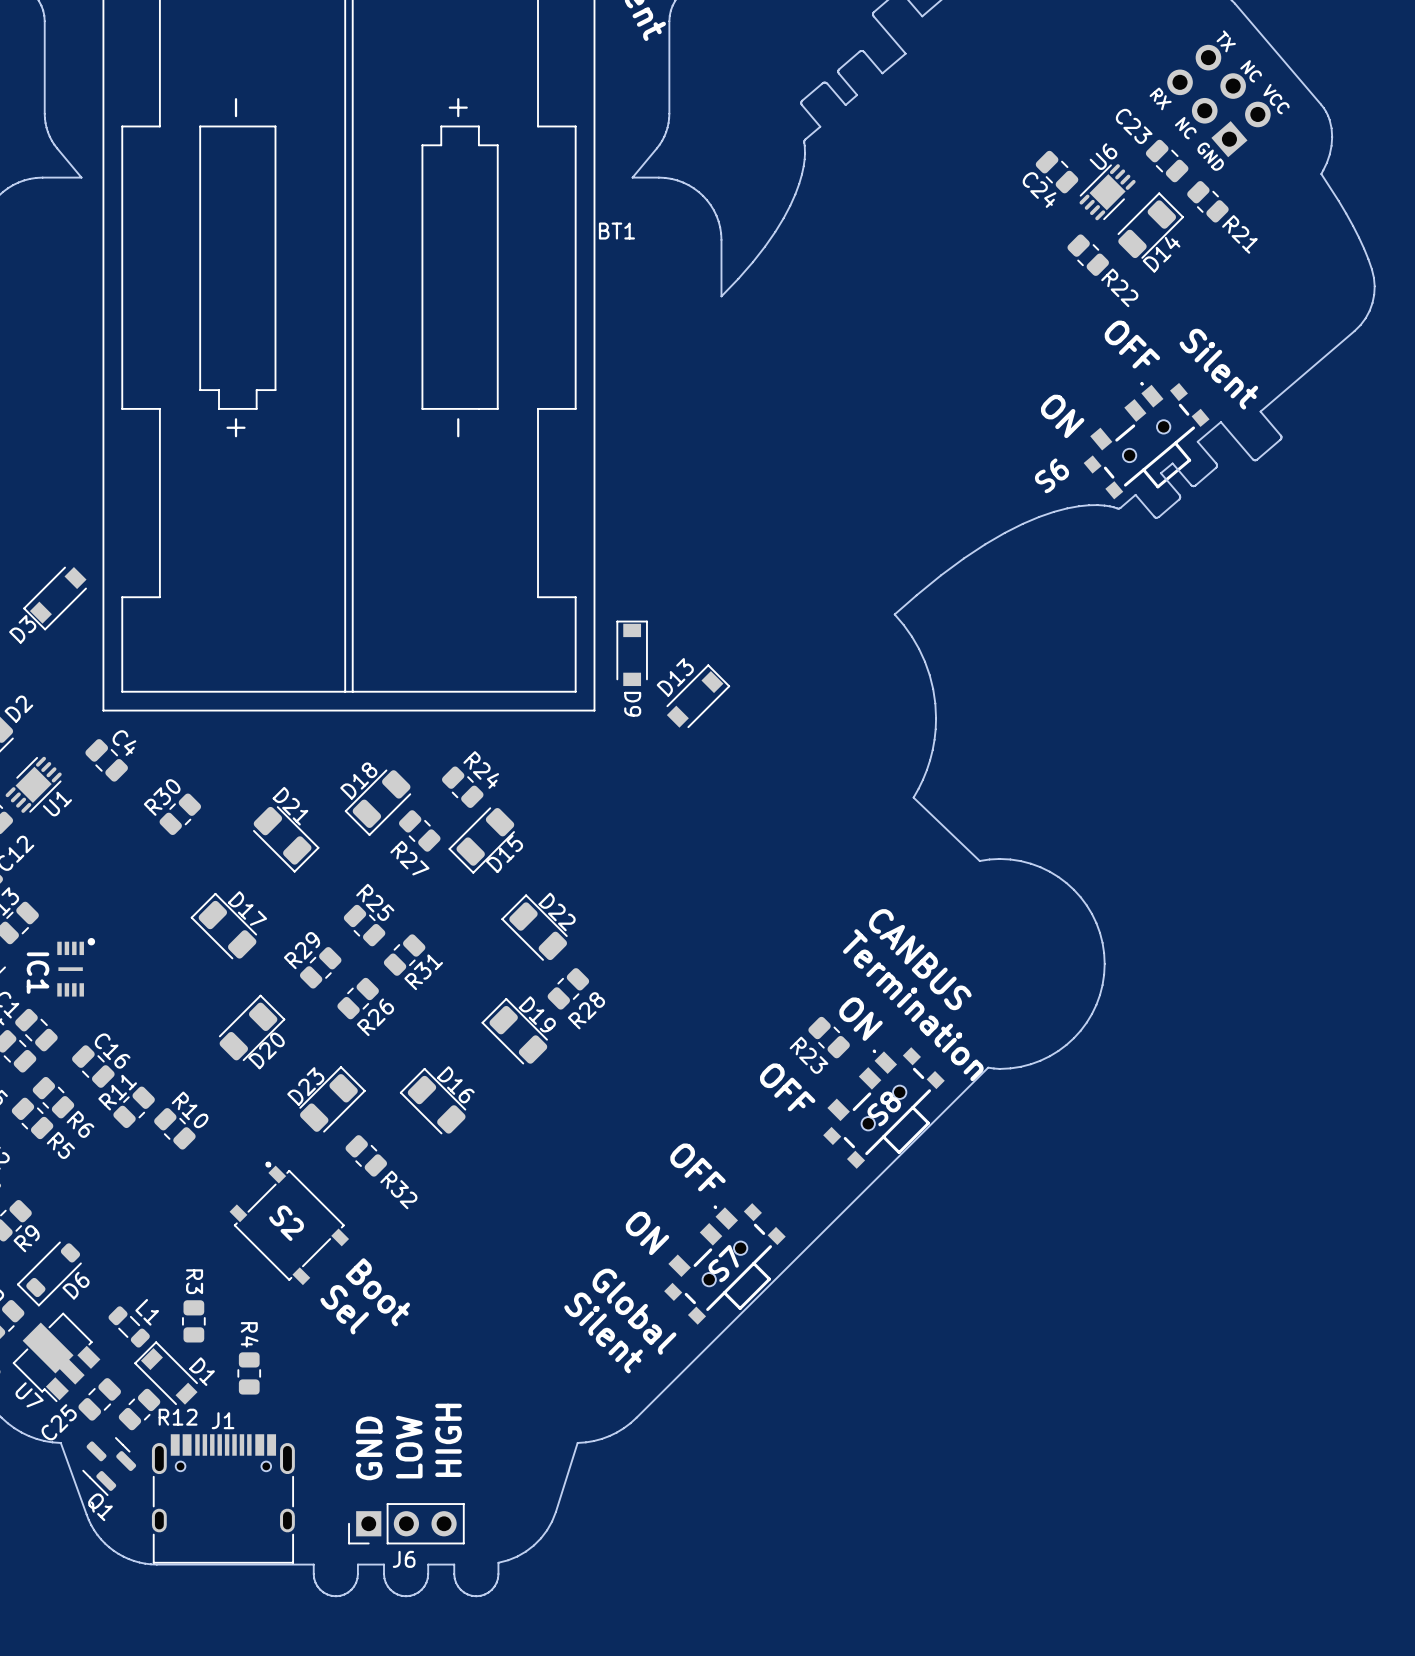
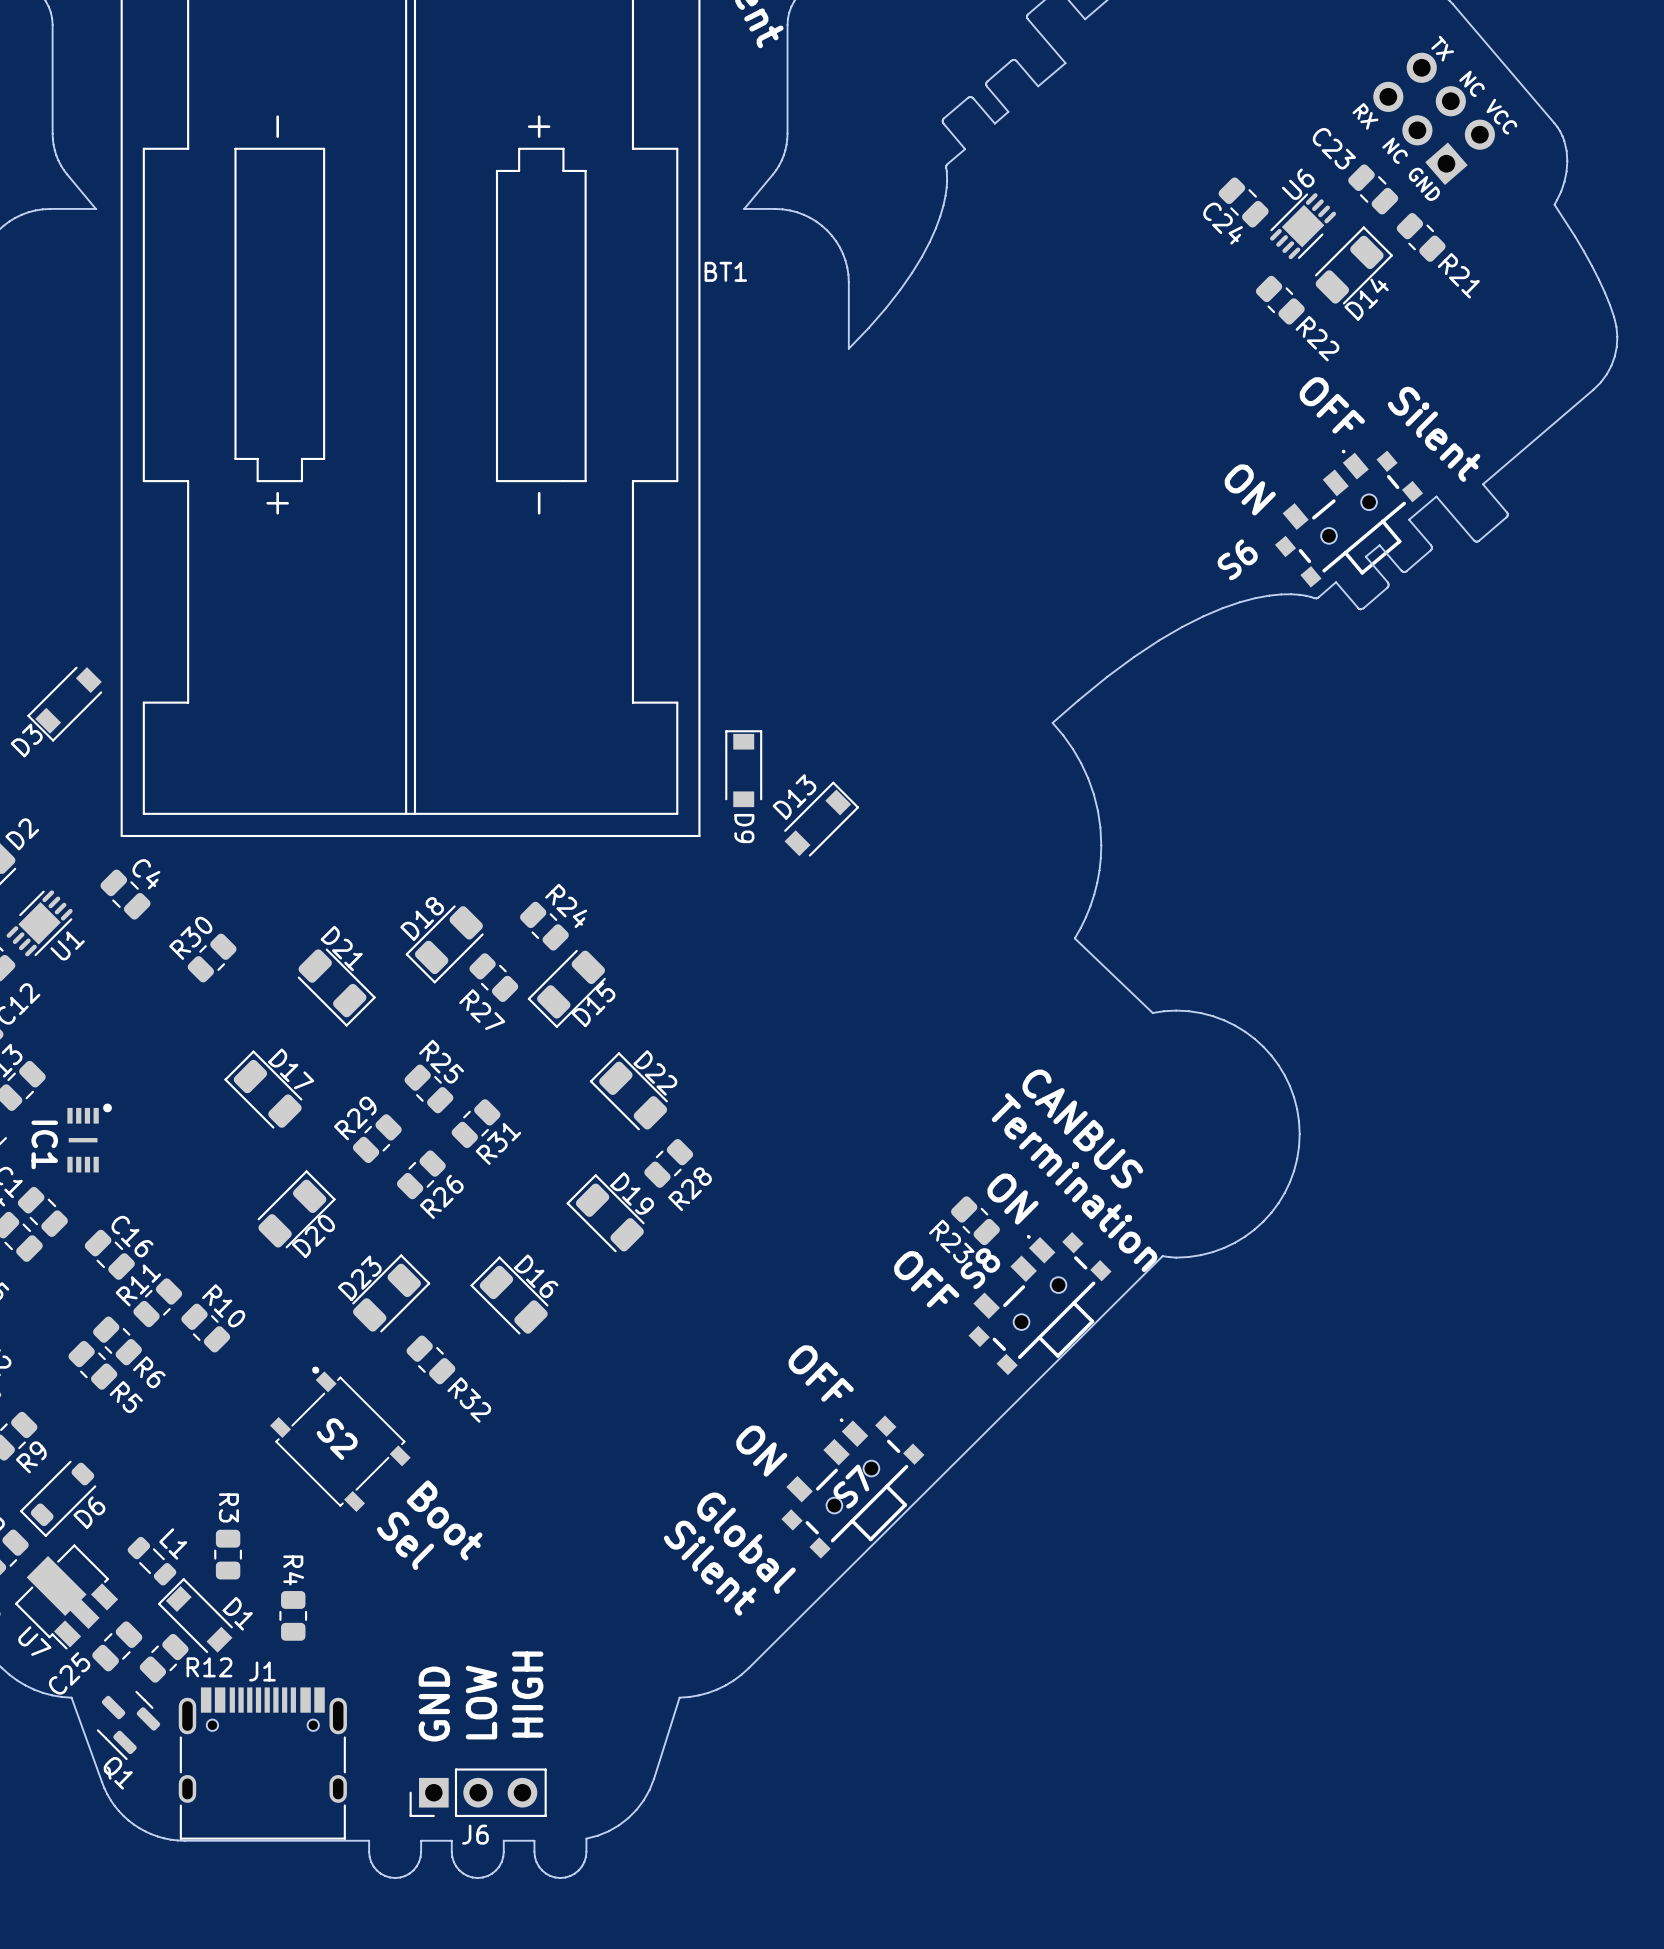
R6 position: (53, 1097) -> (117, 1340)
S8 name position: S8 (884, 1108) -> S8 (980, 1268)
R5 position: (32, 1118) -> (92, 1365)

